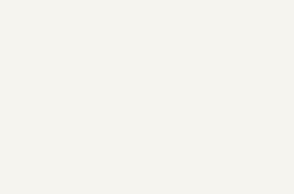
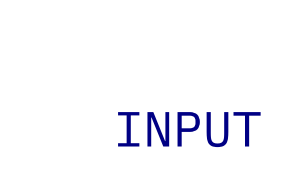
text: none -> INPUT (189, 129)

